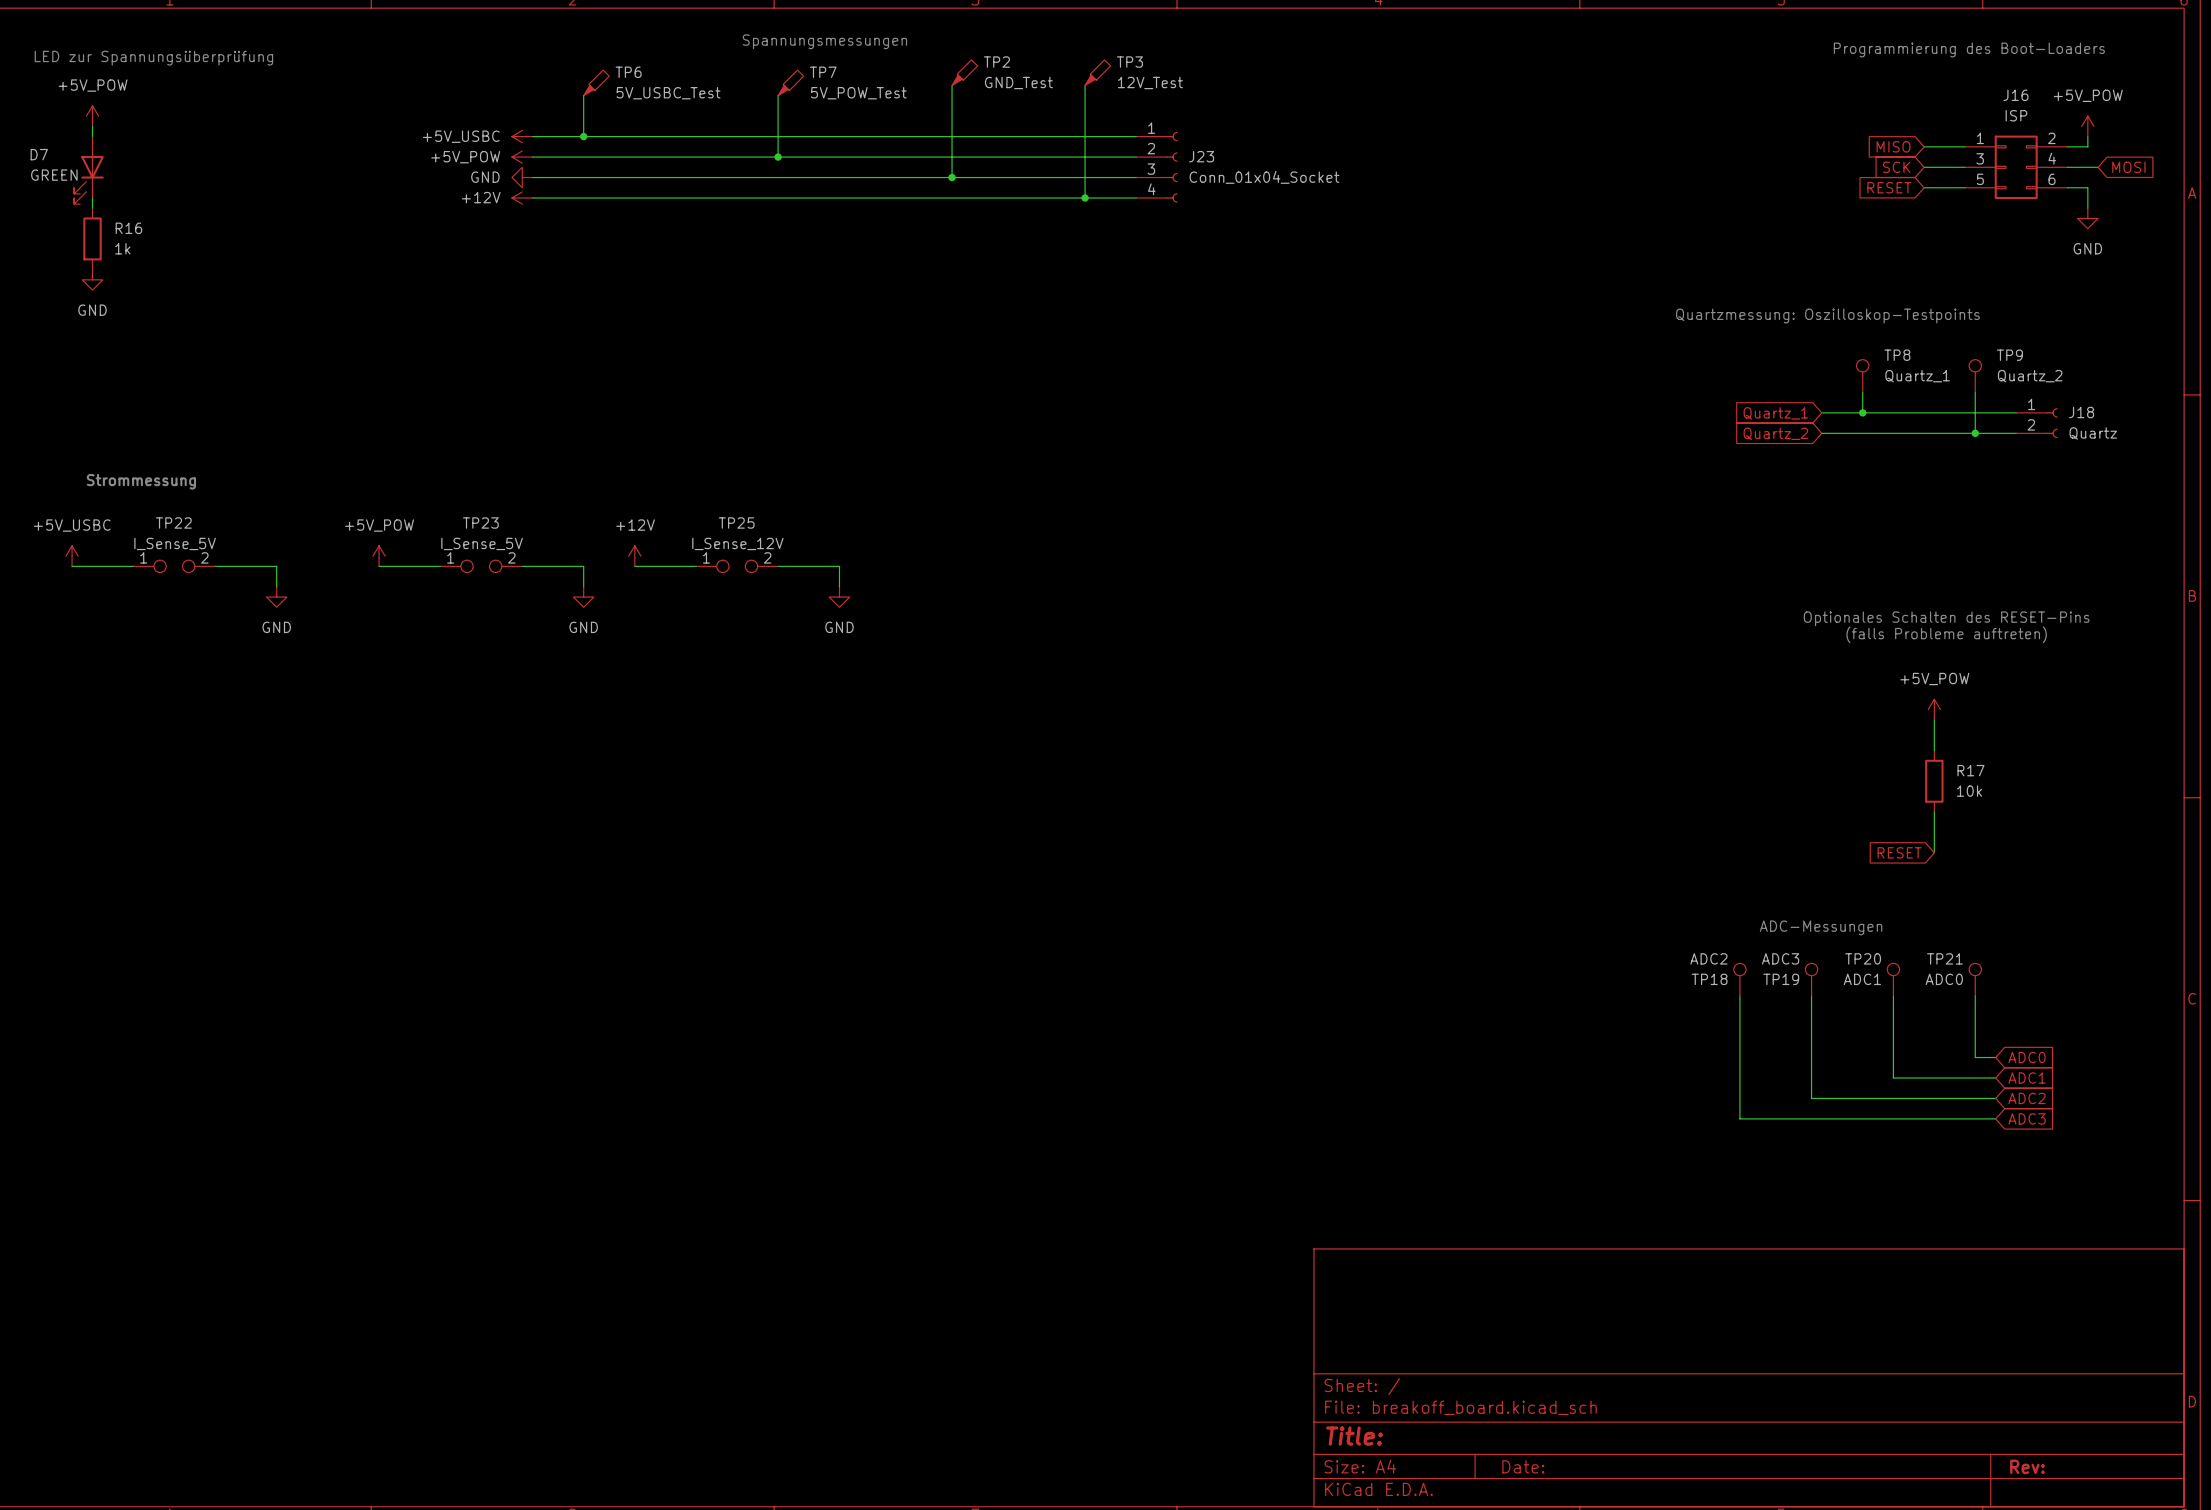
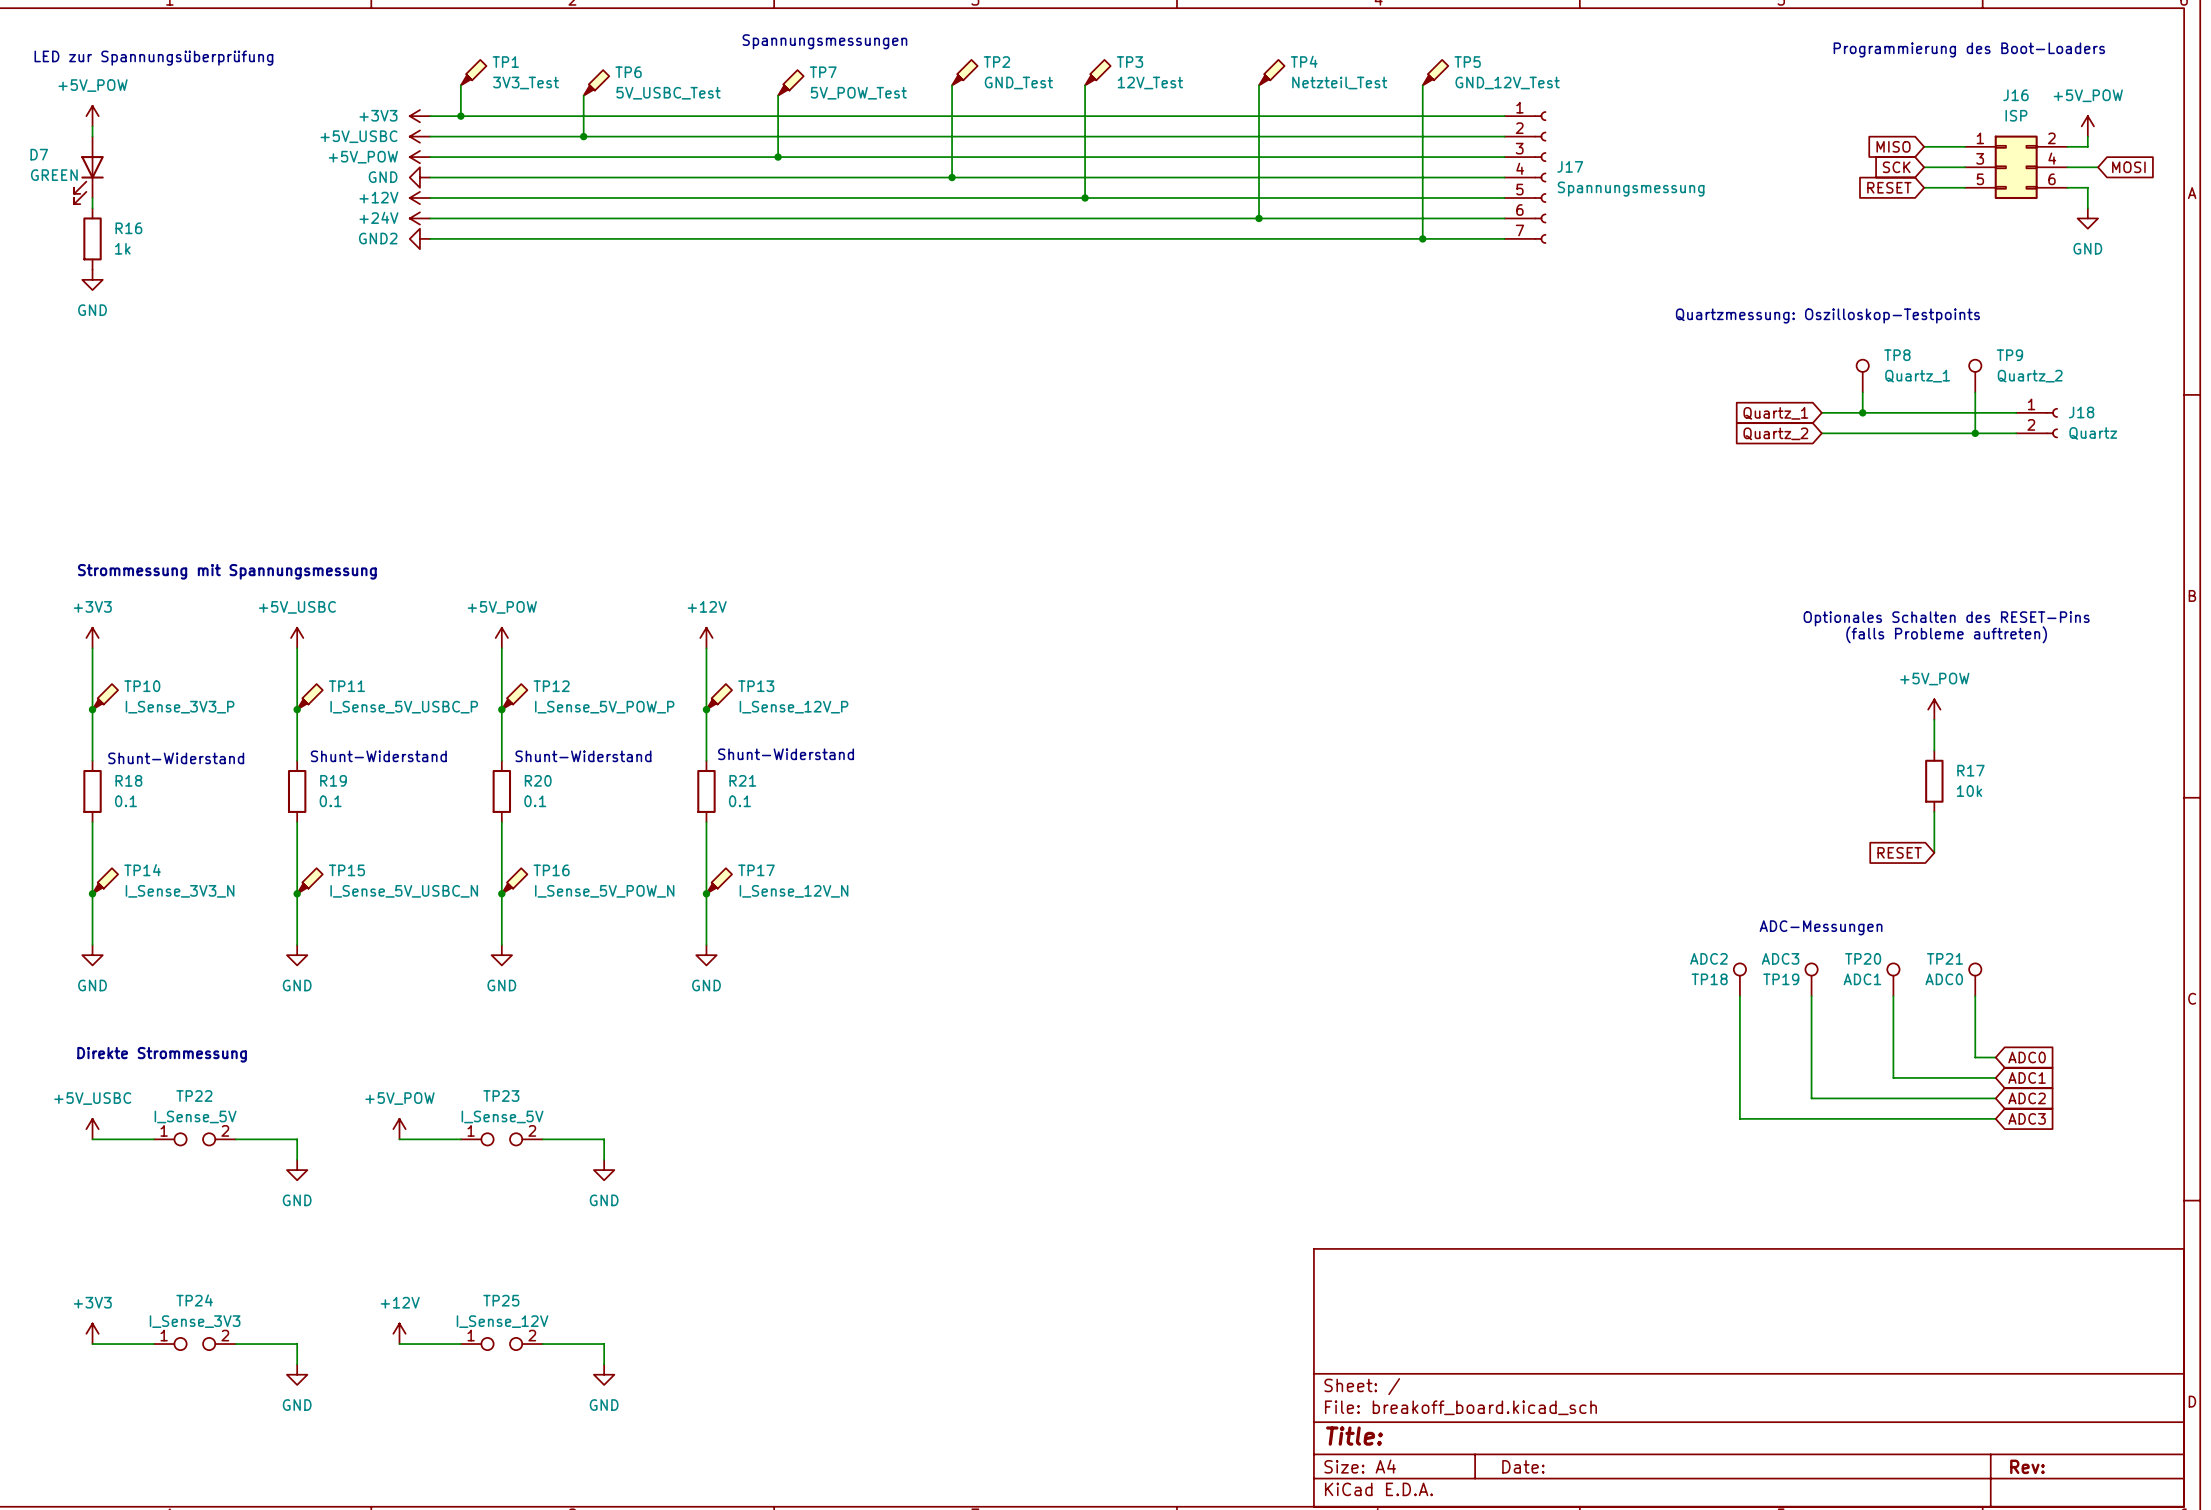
TP1: none -> 3V3_Test (473, 72)
TP4: none -> Netzteil_Test (1271, 72)
TP5: none -> GND_12V_Test (1435, 72)
wire: none -> (460, 85) (460, 116)
wire: none -> (1259, 85) (1259, 218)
wire: none -> (1422, 85) (1422, 238)
power symbol: none -> +3V3 (419, 116)
wire: none -> (430, 116) (1504, 116)
junction: none -> (460, 116)
wire: none -> (430, 136) (532, 136)
power symbol position: +5V_USBC (522, 136) -> +5V_USBC (419, 136)
wire: none -> (1136, 136) (1504, 136)
wire: none -> (430, 157) (532, 157)
power symbol position: +5V_POW (522, 157) -> +5V_POW (419, 157)
wire: none -> (1136, 157) (1504, 157)
J23: Conn_01x04_Socket (1156, 167) -> none
wire: none -> (430, 177) (532, 177)
power symbol position: GND (522, 177) -> GND (419, 177)
wire: none -> (1136, 177) (1504, 177)
J17: none -> Spannungsmessung (1525, 177)
wire: none -> (430, 197) (532, 197)
power symbol position: +12V (522, 197) -> +12V (419, 197)
wire: none -> (1136, 197) (1504, 197)
power symbol: none -> +24V (419, 218)
wire: none -> (430, 218) (1504, 218)
junction: none -> (1259, 218)
power symbol: none -> GND2 (419, 238)
wire: none -> (430, 238) (1504, 238)
junction: none -> (1422, 238)
text: Strommessung (141, 481) -> none
power symbol: +5V_USBC (72, 556) -> none
power symbol position: +5V_POW (379, 556) -> +5V_POW (501, 637)
power symbol position: +12V (634, 556) -> +12V (706, 637)
wire: (72, 566) (133, 566) -> none
TP22 position: (174, 566) -> (194, 1139)
wire: (215, 566) (276, 566) (276, 586) -> none
wire: (379, 566) (440, 566) -> none
TP23 position: (481, 566) -> (501, 1139)
wire: (522, 566) (583, 566) (583, 586) -> none
wire: (634, 566) (696, 566) -> none
TP25 position: (737, 566) -> (501, 1344)
wire: (778, 566) (839, 566) (839, 586) -> none
text: none -> Strommessung mit Spannungsmessung (227, 571)
power symbol: GND (276, 597) -> none
power symbol: GND (583, 597) -> none
power symbol: GND (839, 597) -> none
power symbol: none -> +3V3 (92, 637)
power symbol: none -> +5V_USBC (297, 637)
wire: none -> (92, 648) (92, 760)
wire: none -> (297, 648) (297, 760)
wire: none -> (501, 648) (501, 760)
wire: none -> (706, 648) (706, 760)
TP10: none -> I_Sense_3V3_P (105, 696)
TP11: none -> I_Sense_5V_USBC_P (309, 696)
TP12: none -> I_Sense_5V_POW_P (514, 696)
TP13: none -> I_Sense_12V_P (719, 696)
junction: none -> (92, 709)
junction: none -> (297, 709)
junction: none -> (501, 709)
junction: none -> (706, 709)
text: none -> Shunt-Widerstand (786, 754)
text: none -> Shunt-Widerstand (378, 756)
text: none -> Shunt-Widerstand (583, 756)
text: none -> Shunt-Widerstand (176, 758)
R18: none -> 0.1 (92, 791)
R19: none -> 0.1 (297, 791)
R20: none -> 0.1 (501, 791)
R21: none -> 0.1 (706, 791)
wire: none -> (92, 822) (92, 944)
wire: none -> (297, 822) (297, 944)
wire: none -> (501, 822) (501, 944)
wire: none -> (706, 822) (706, 944)
TP14: none -> I_Sense_3V3_N (105, 881)
TP15: none -> I_Sense_5V_USBC_N (309, 881)
TP16: none -> I_Sense_5V_POW_N (514, 881)
TP17: none -> I_Sense_12V_N (719, 881)
junction: none -> (92, 893)
junction: none -> (297, 893)
junction: none -> (501, 893)
junction: none -> (706, 893)
power symbol: none -> GND (92, 955)
power symbol: none -> GND (297, 955)
power symbol: none -> GND (501, 955)
power symbol: none -> GND (706, 955)
text: none -> Direkte Strommessung (162, 1054)
power symbol: none -> +5V_USBC (92, 1129)
power symbol: none -> +5V_POW (399, 1129)
wire: none -> (92, 1139) (153, 1139)
wire: none -> (235, 1139) (297, 1139) (297, 1159)
wire: none -> (399, 1139) (460, 1139)
wire: none -> (542, 1139) (604, 1139) (604, 1159)
power symbol: none -> GND (297, 1170)
power symbol: none -> GND (604, 1170)
power symbol: none -> +3V3 (92, 1333)
power symbol: none -> +12V (399, 1333)
wire: none -> (92, 1344) (153, 1344)
TP24: none -> I_Sense_3V3 (194, 1344)
wire: none -> (235, 1344) (297, 1344) (297, 1364)
wire: none -> (399, 1344) (460, 1344)
wire: none -> (542, 1344) (604, 1344) (604, 1364)
power symbol: none -> GND (297, 1374)
power symbol: none -> GND (604, 1374)

